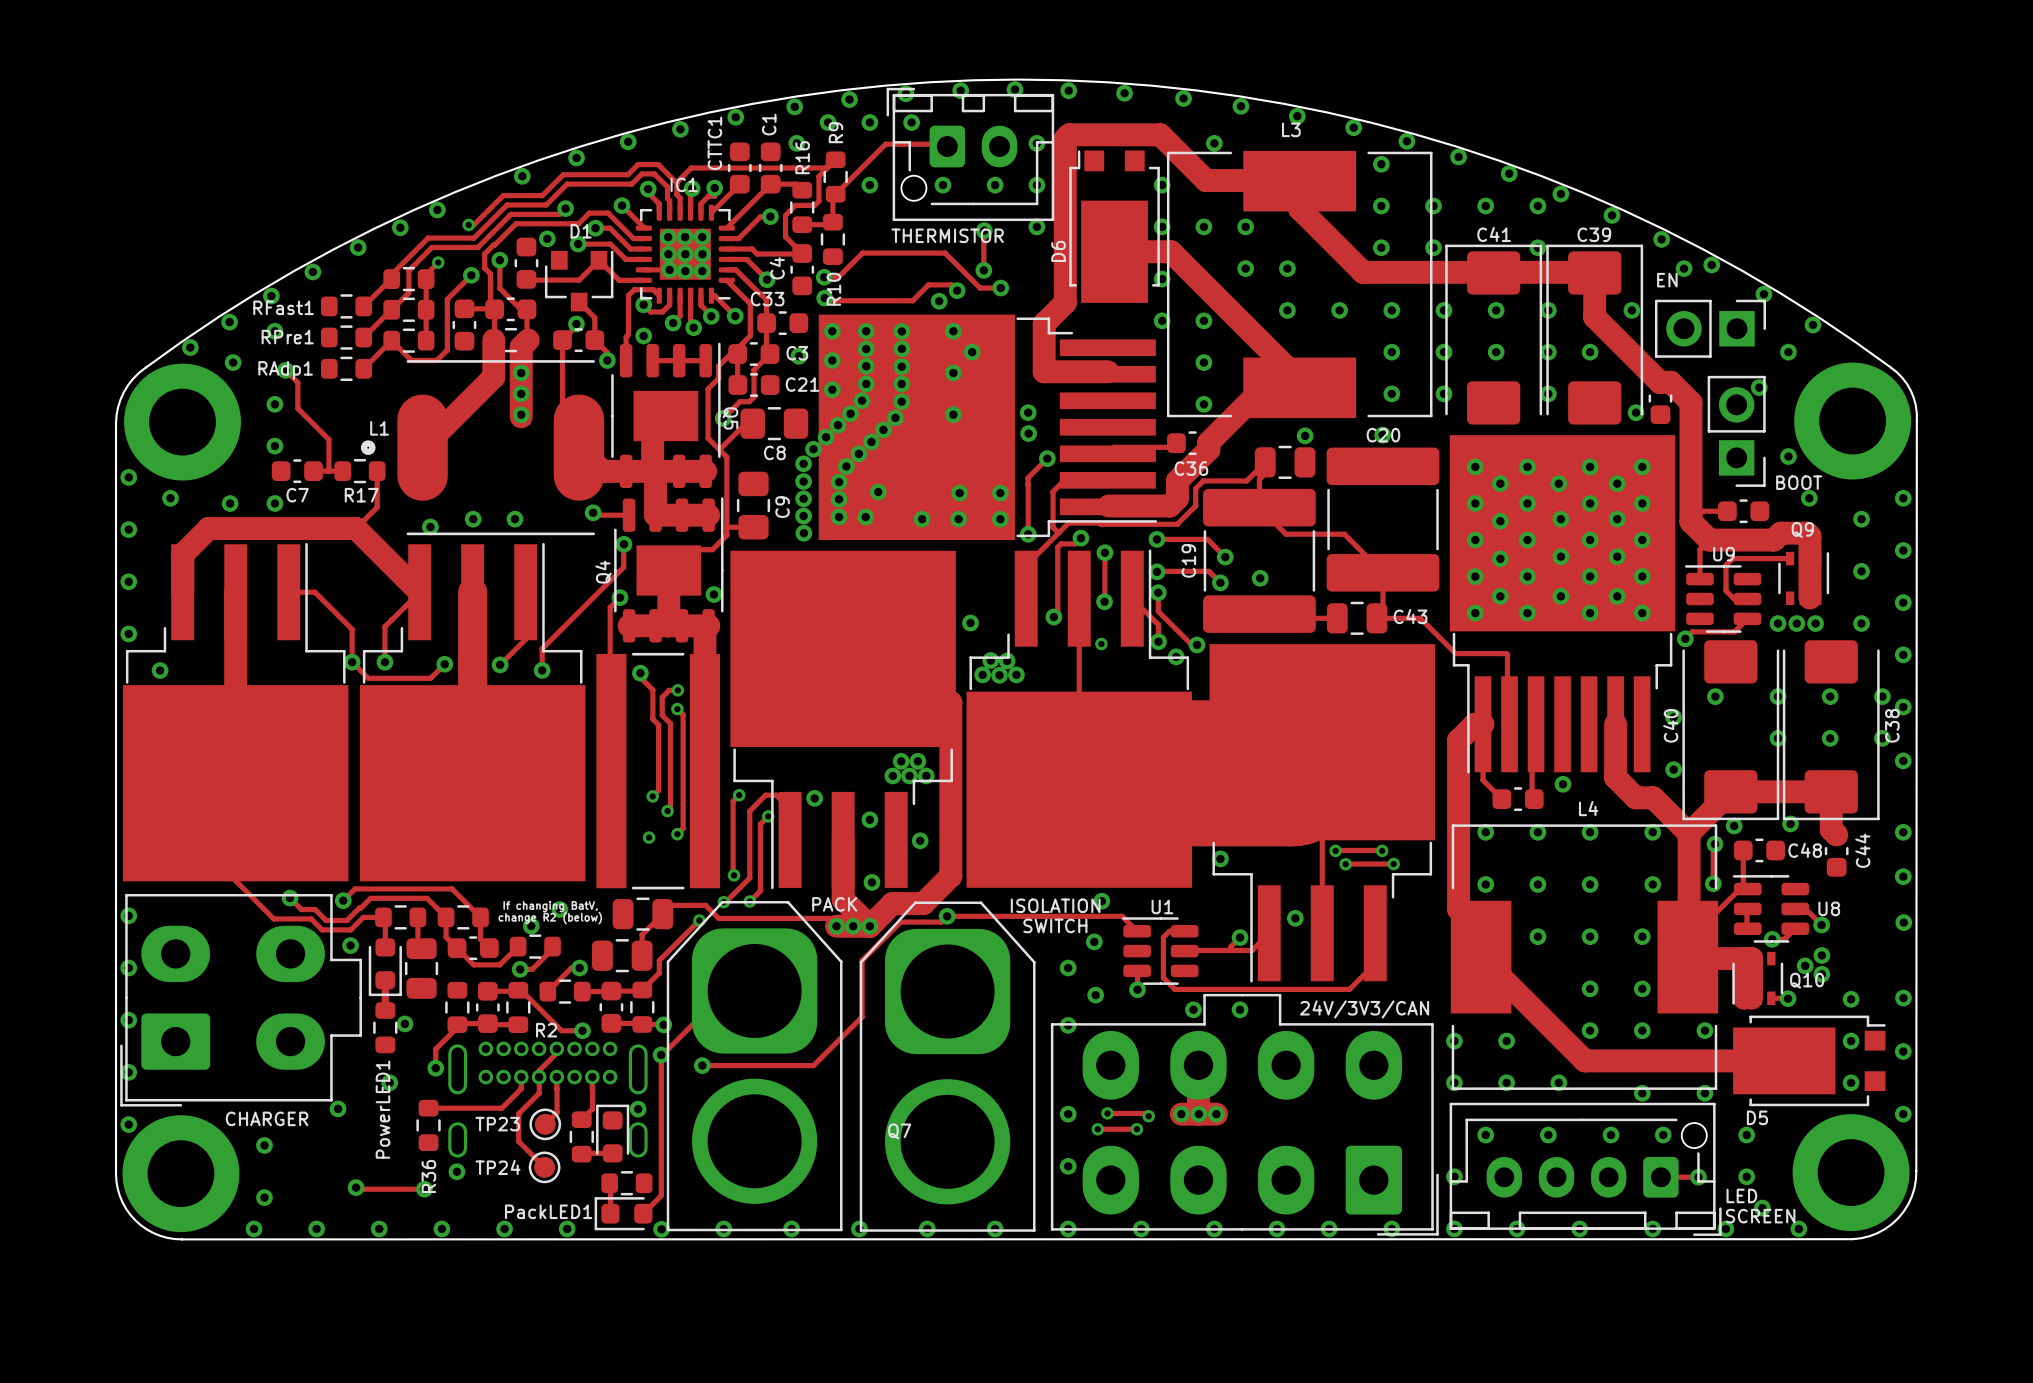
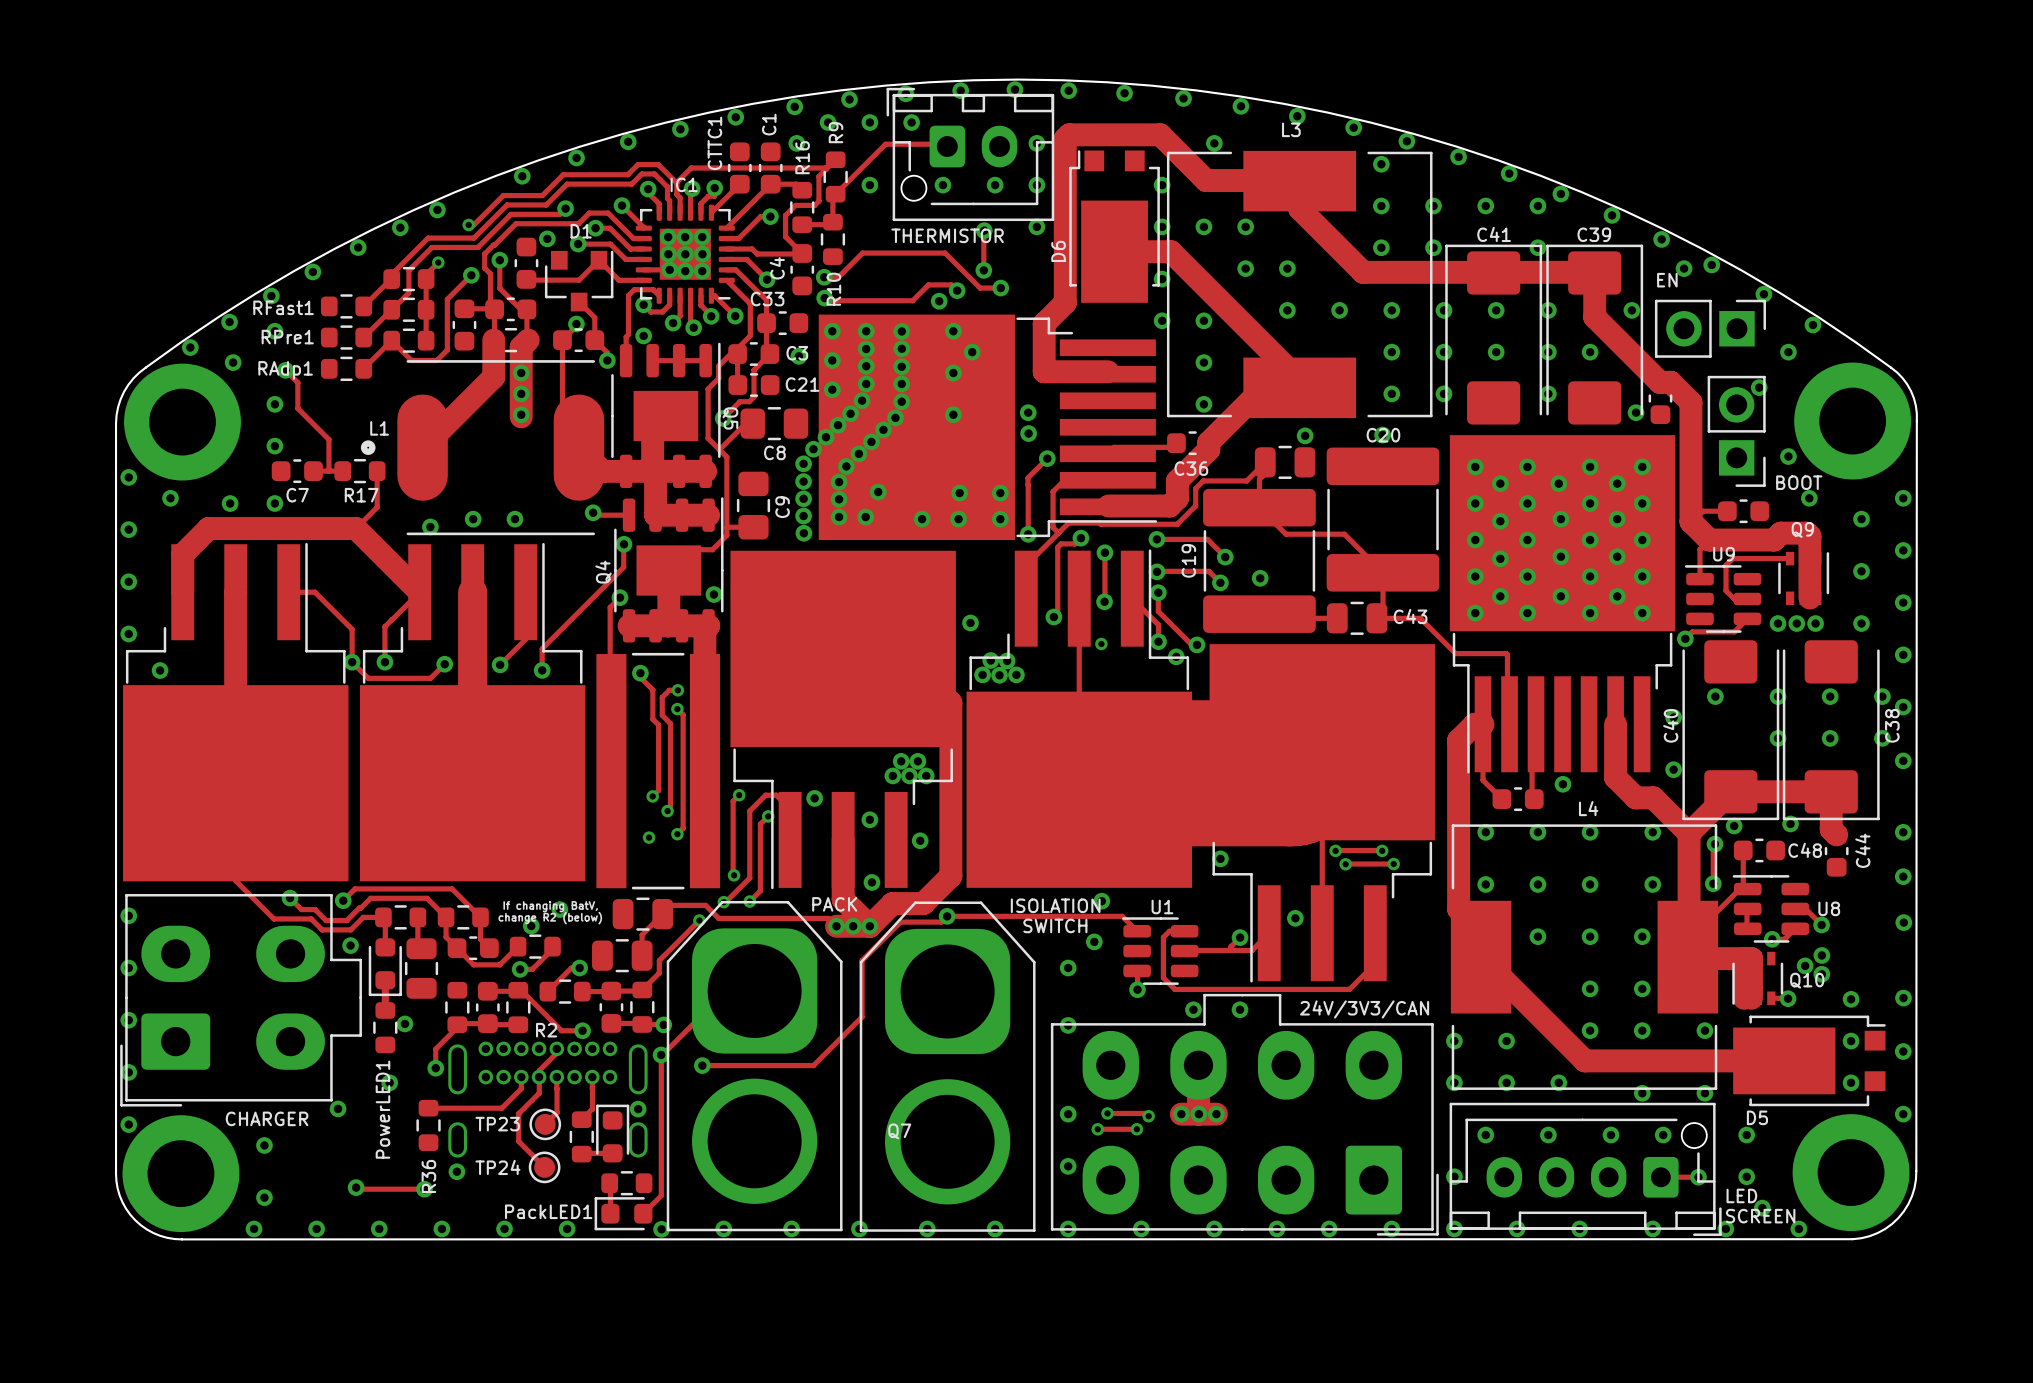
via: (1095, 995) -> none

